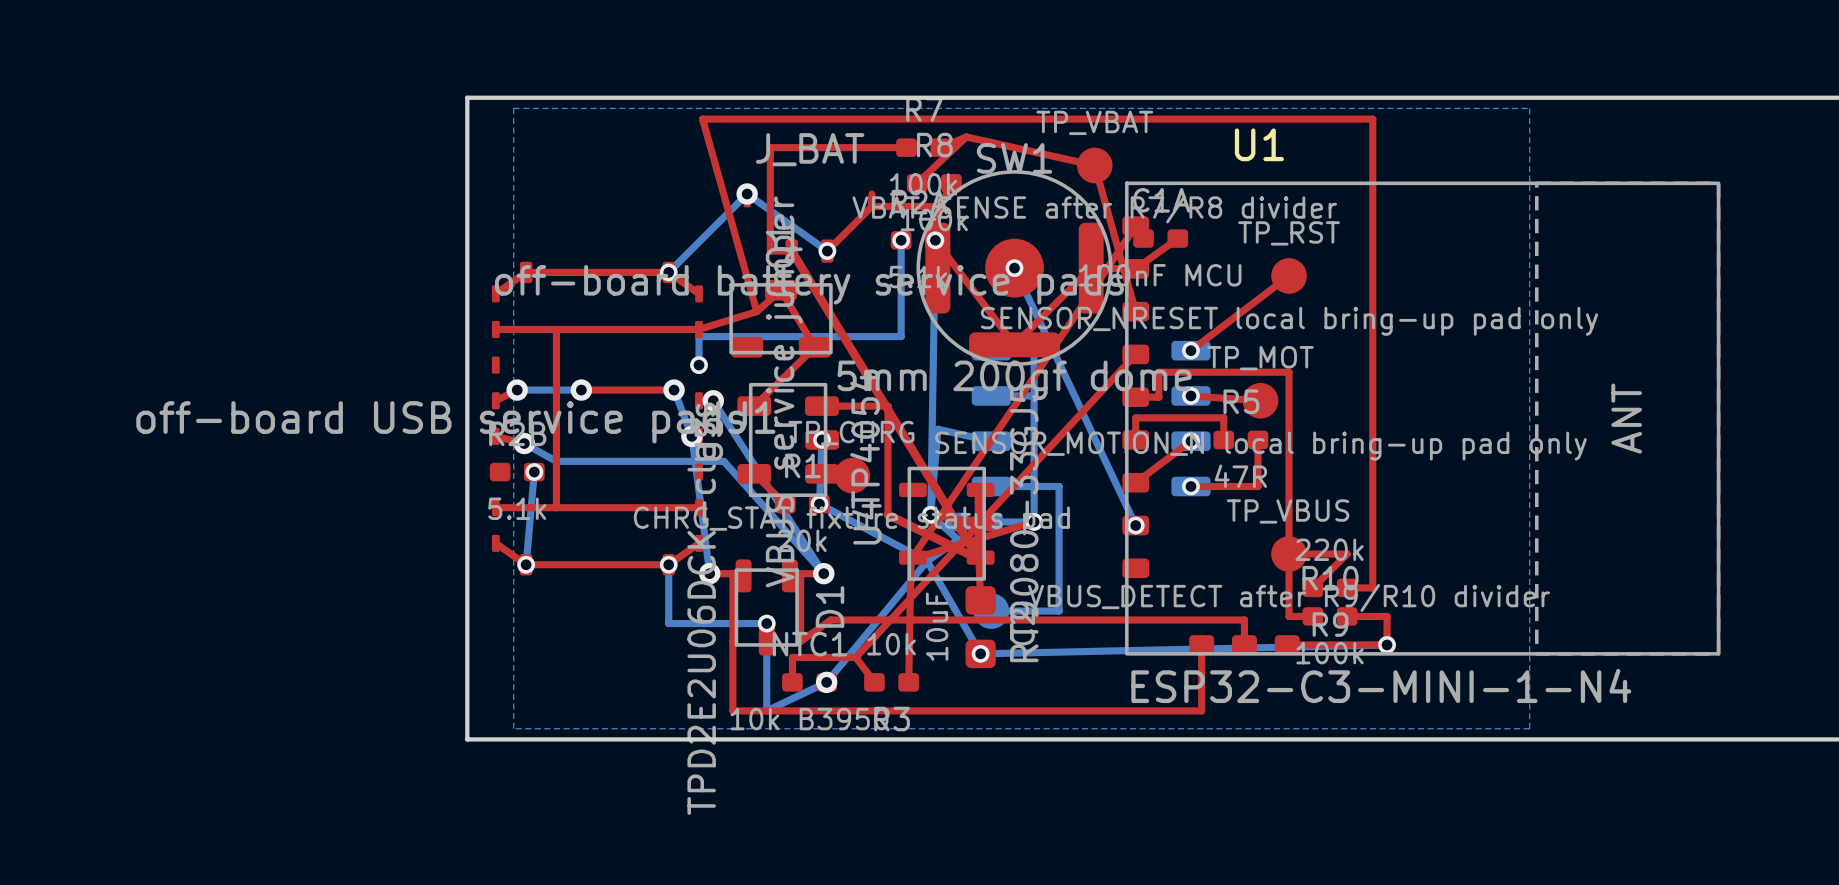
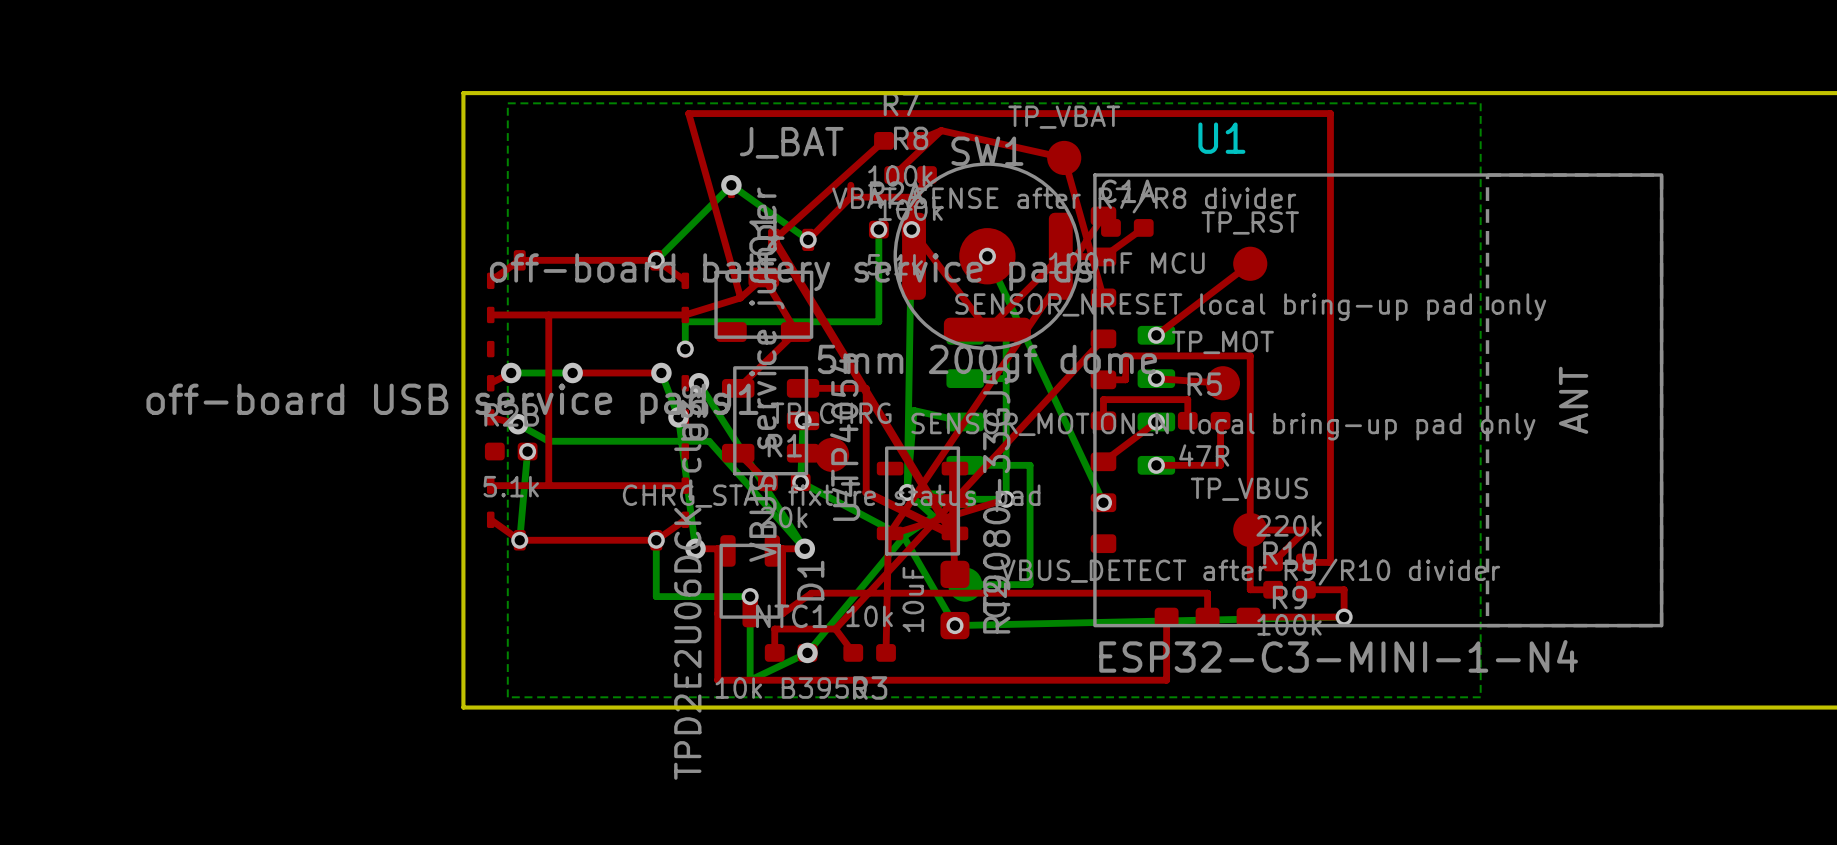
top track: (906, 147) (770, 147) (770, 251) (791, 251) -> (883, 140) (774, 239)

